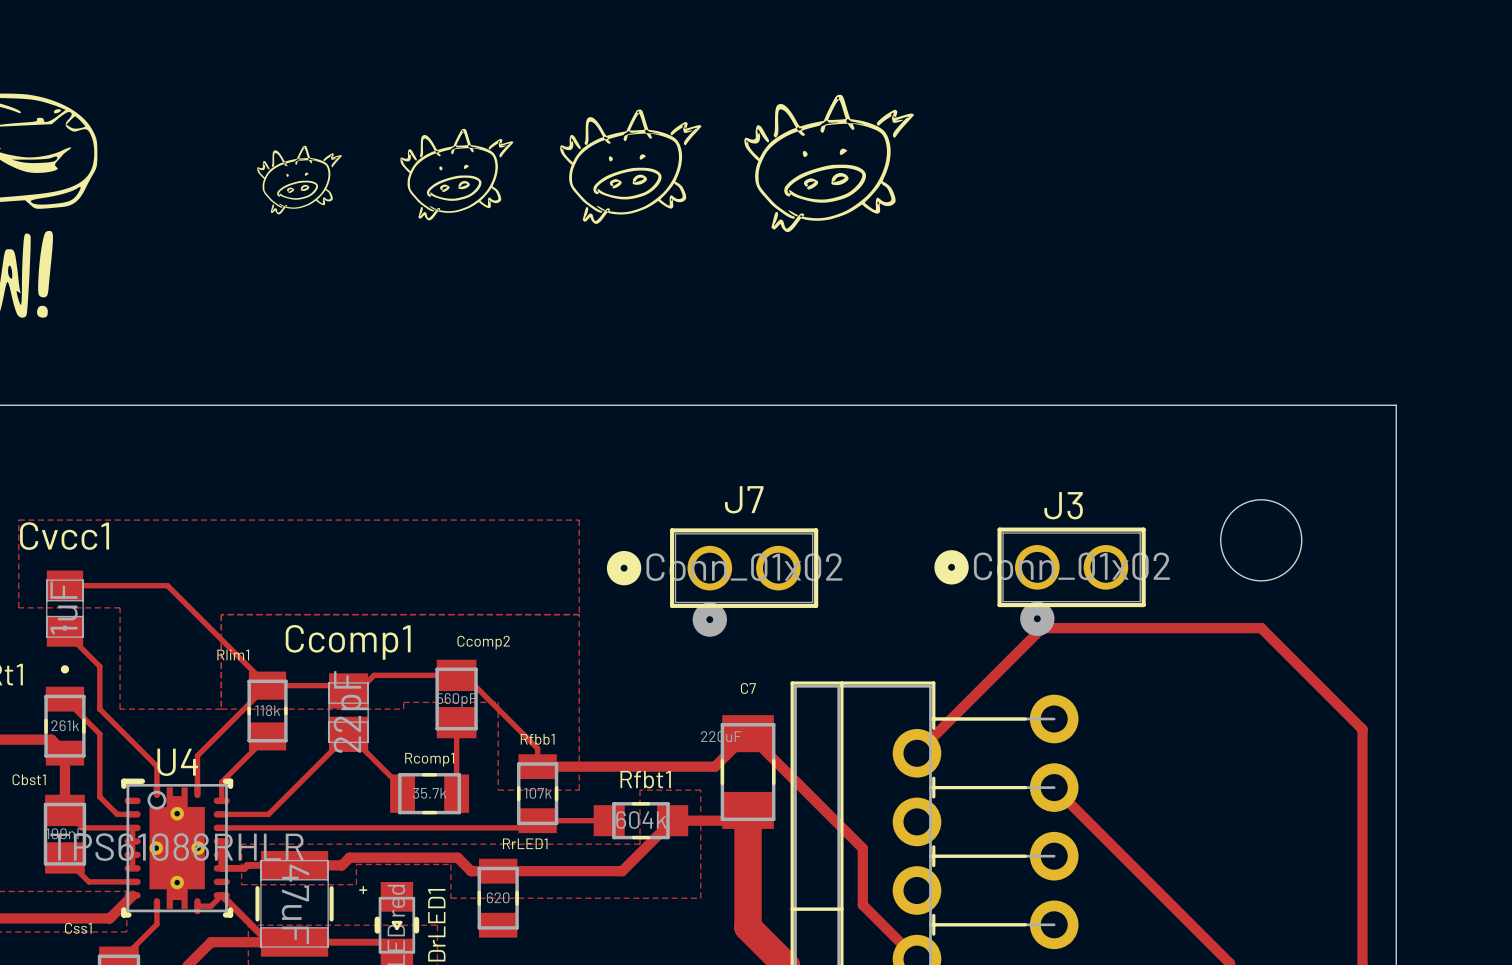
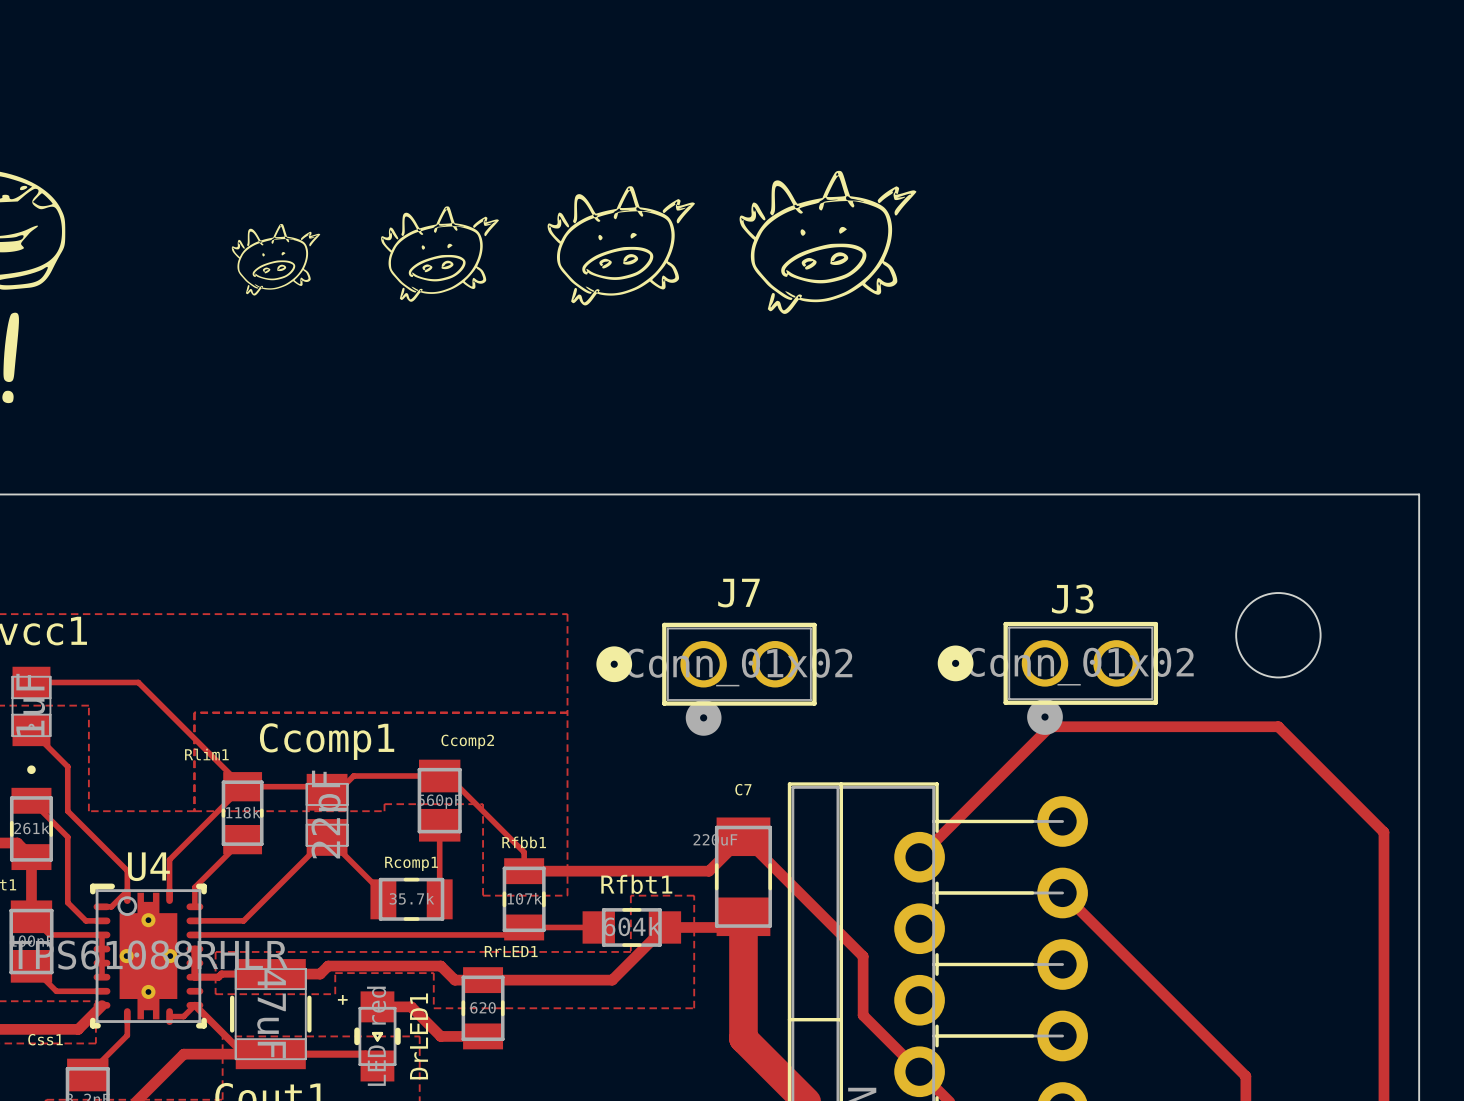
track: none -> (125, 893) (111, 906) (101, 906)
track: none -> (377, 1006) (411, 1006) (440, 1036) (483, 1036)

